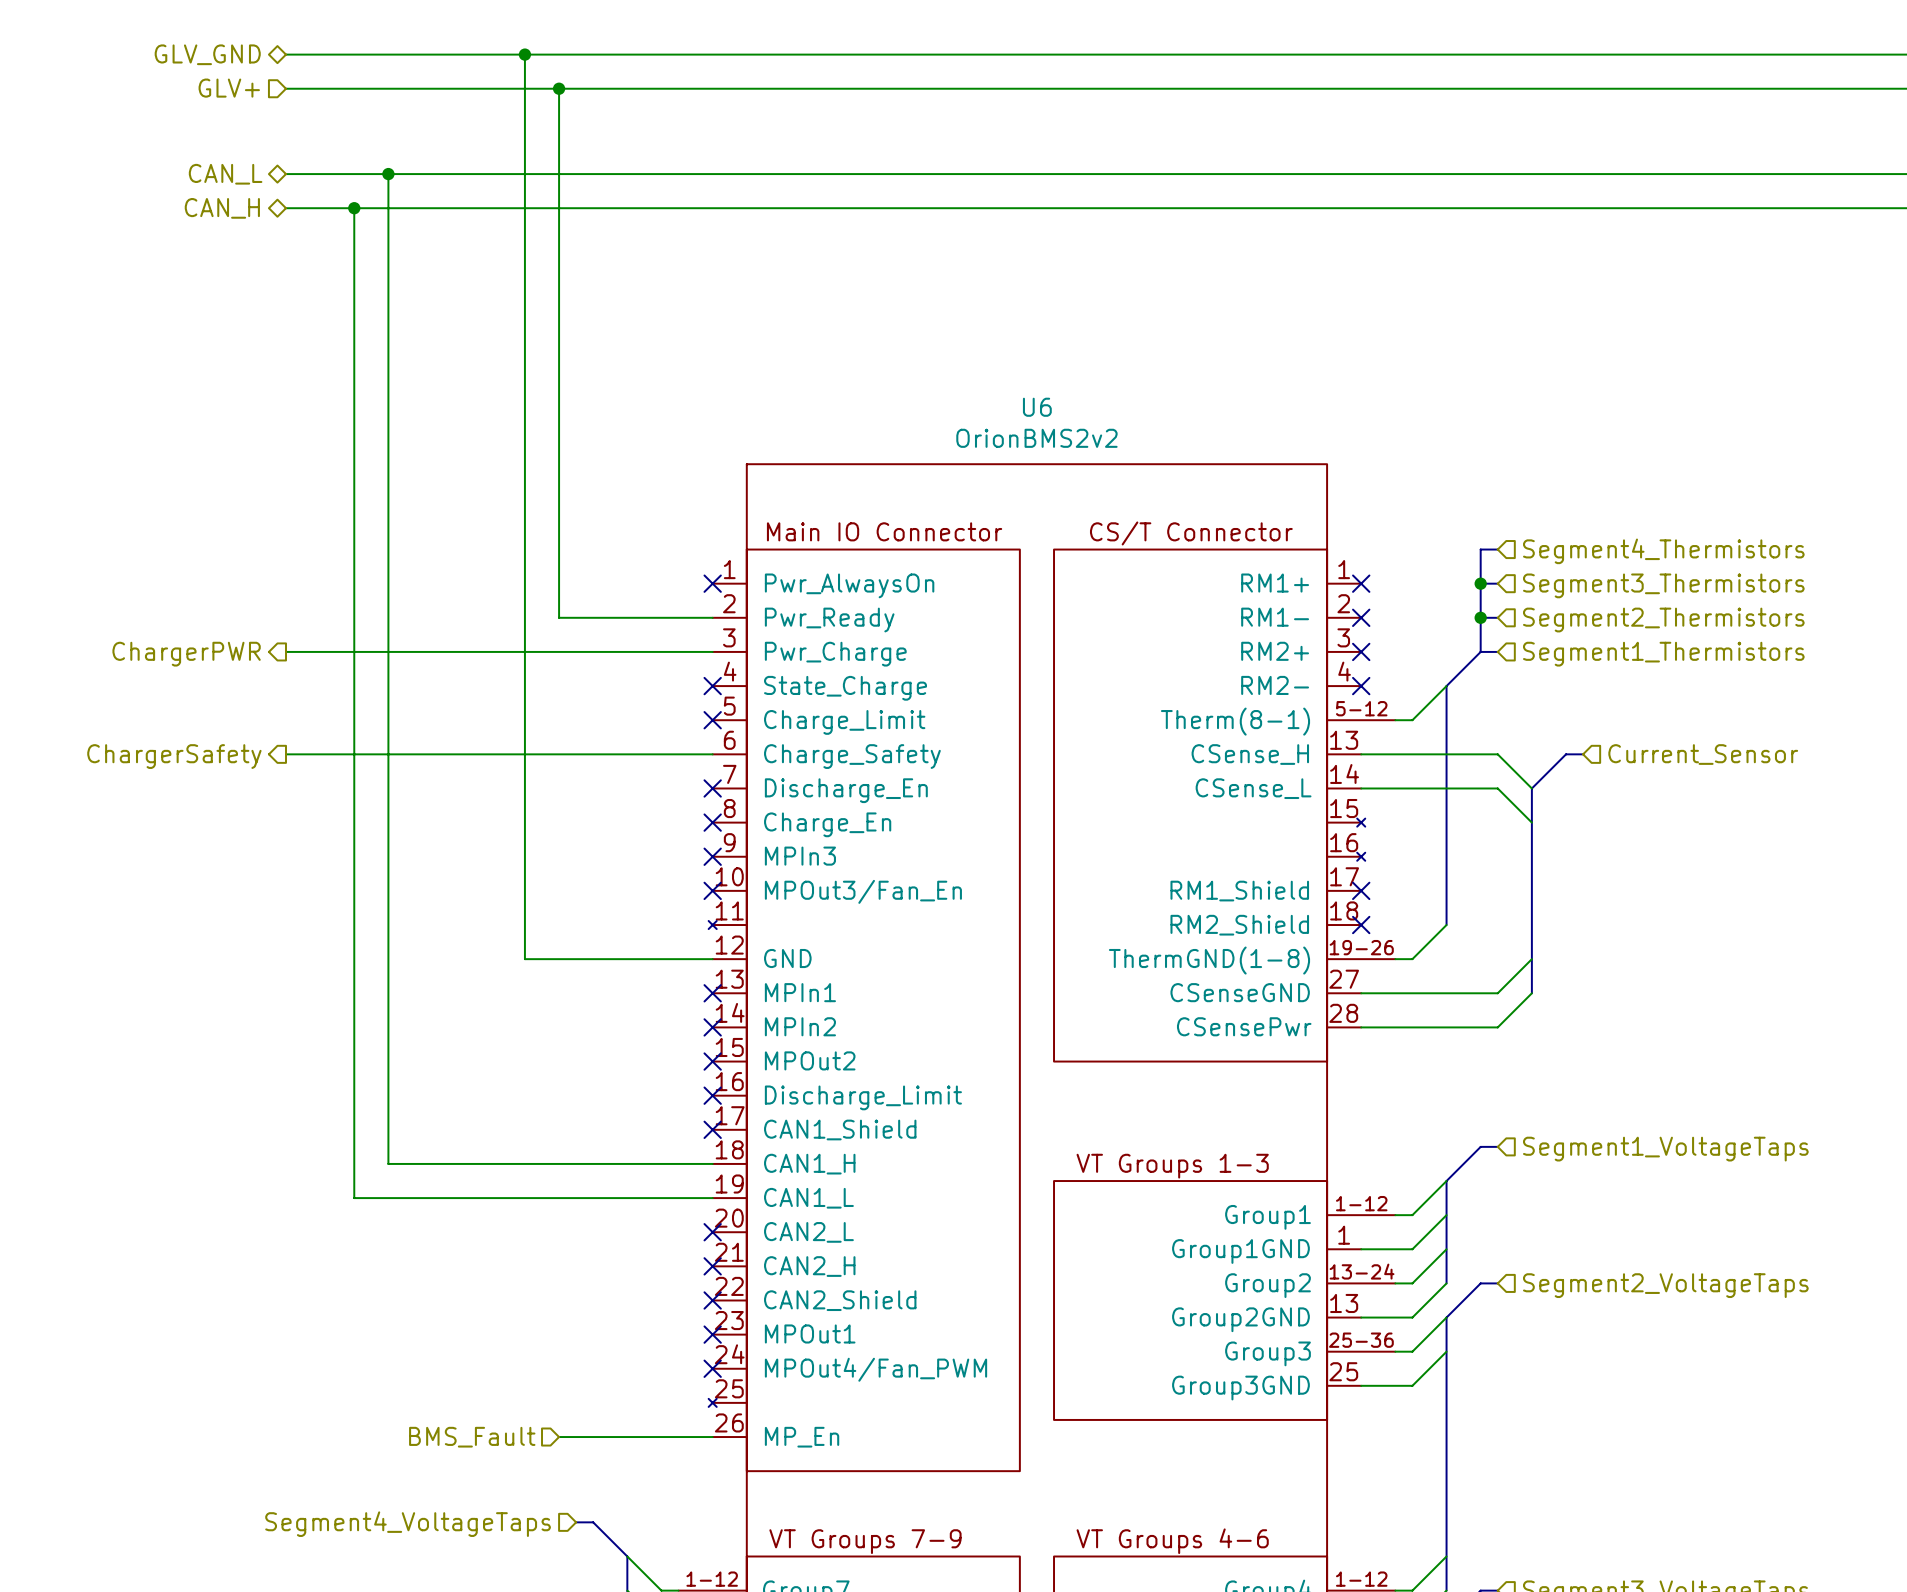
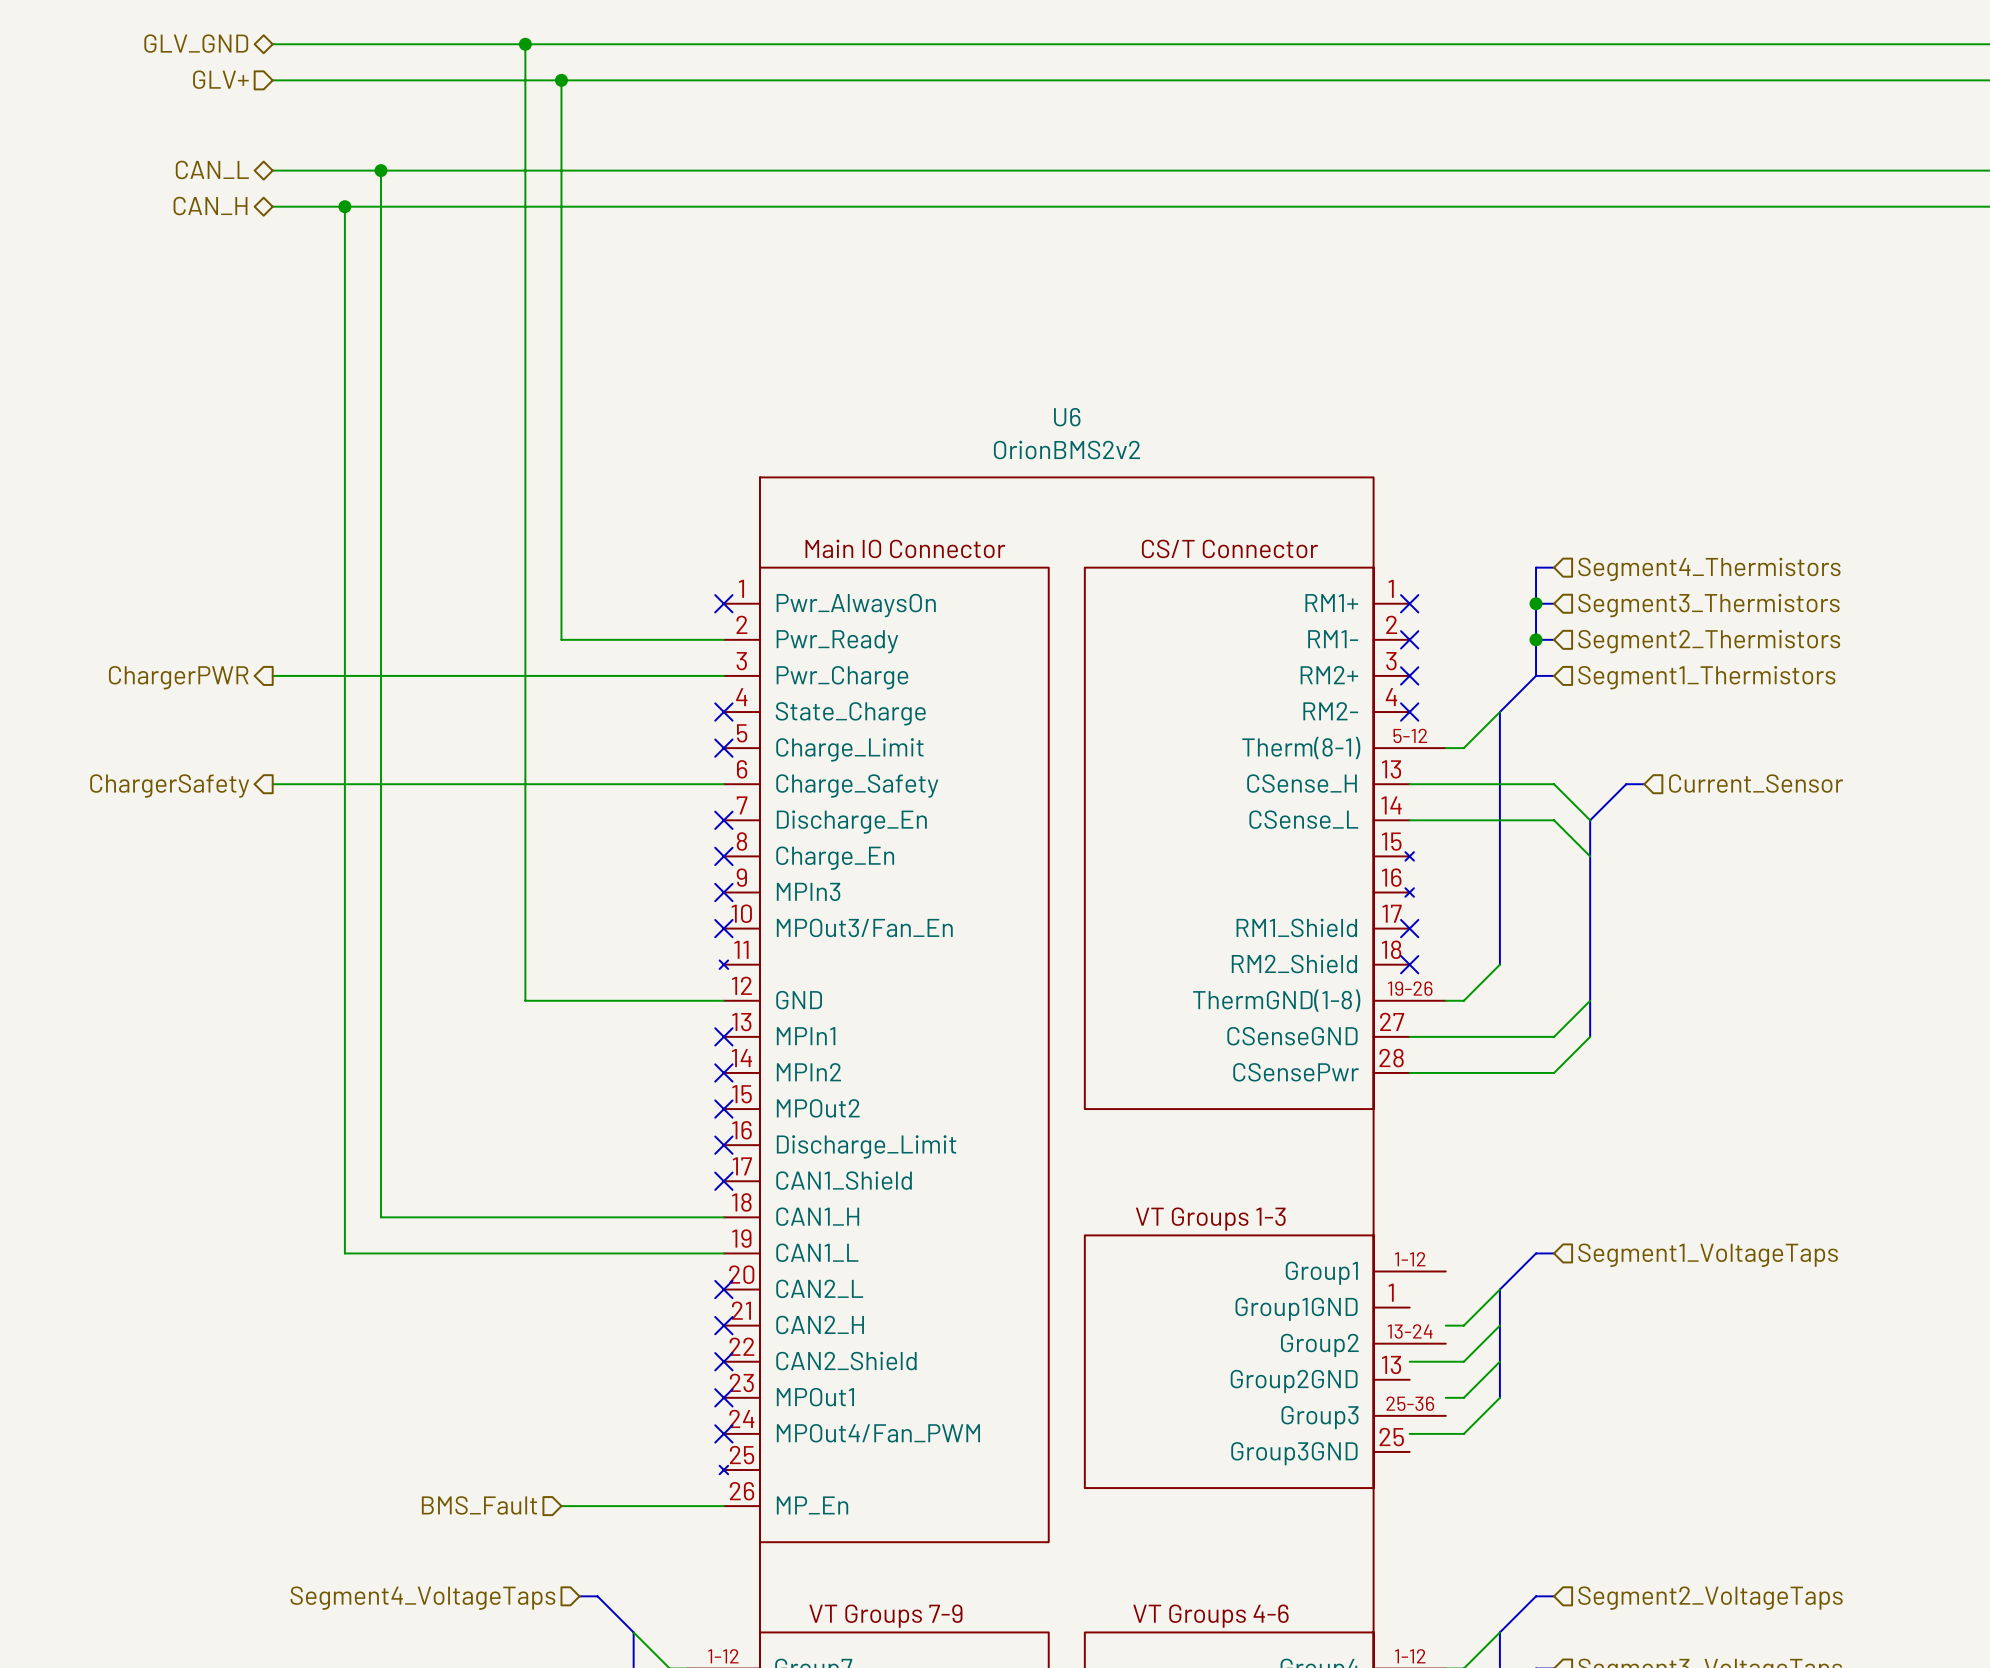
bus: (1497, 1146) (1480, 1146) (1446, 1181) (1446, 1232) -> (1554, 1253) (1536, 1253) (1499, 1289)
hierarchical label position: Segment1_VoltageTaps (1665, 1149) -> Segment1_VoltageTaps (1708, 1255)
wire: (1446, 1181) (1412, 1215) (1395, 1215) -> none
wire: (1446, 1215) (1412, 1249) (1361, 1249) -> none
wire: (1446, 1249) (1412, 1283) (1395, 1283) -> (1499, 1289) (1463, 1325) (1445, 1325)
wire: (1446, 1283) (1412, 1317) (1361, 1317) -> (1499, 1325) (1463, 1361) (1409, 1361)
bus: (1497, 1283) (1480, 1283) (1446, 1317) -> (1499, 1343) (1499, 1379)
hierarchical label position: Segment2_VoltageTaps (1665, 1285) -> Segment2_VoltageTaps (1710, 1598)
wire: (1446, 1317) (1412, 1351) (1395, 1351) -> (1499, 1361) (1463, 1397) (1445, 1397)
bus: (1446, 1334) (1446, 1556) -> (1554, 1596) (1536, 1596) (1499, 1632)
wire: (1446, 1351) (1412, 1385) (1361, 1385) -> (1499, 1397) (1463, 1433) (1409, 1433)

